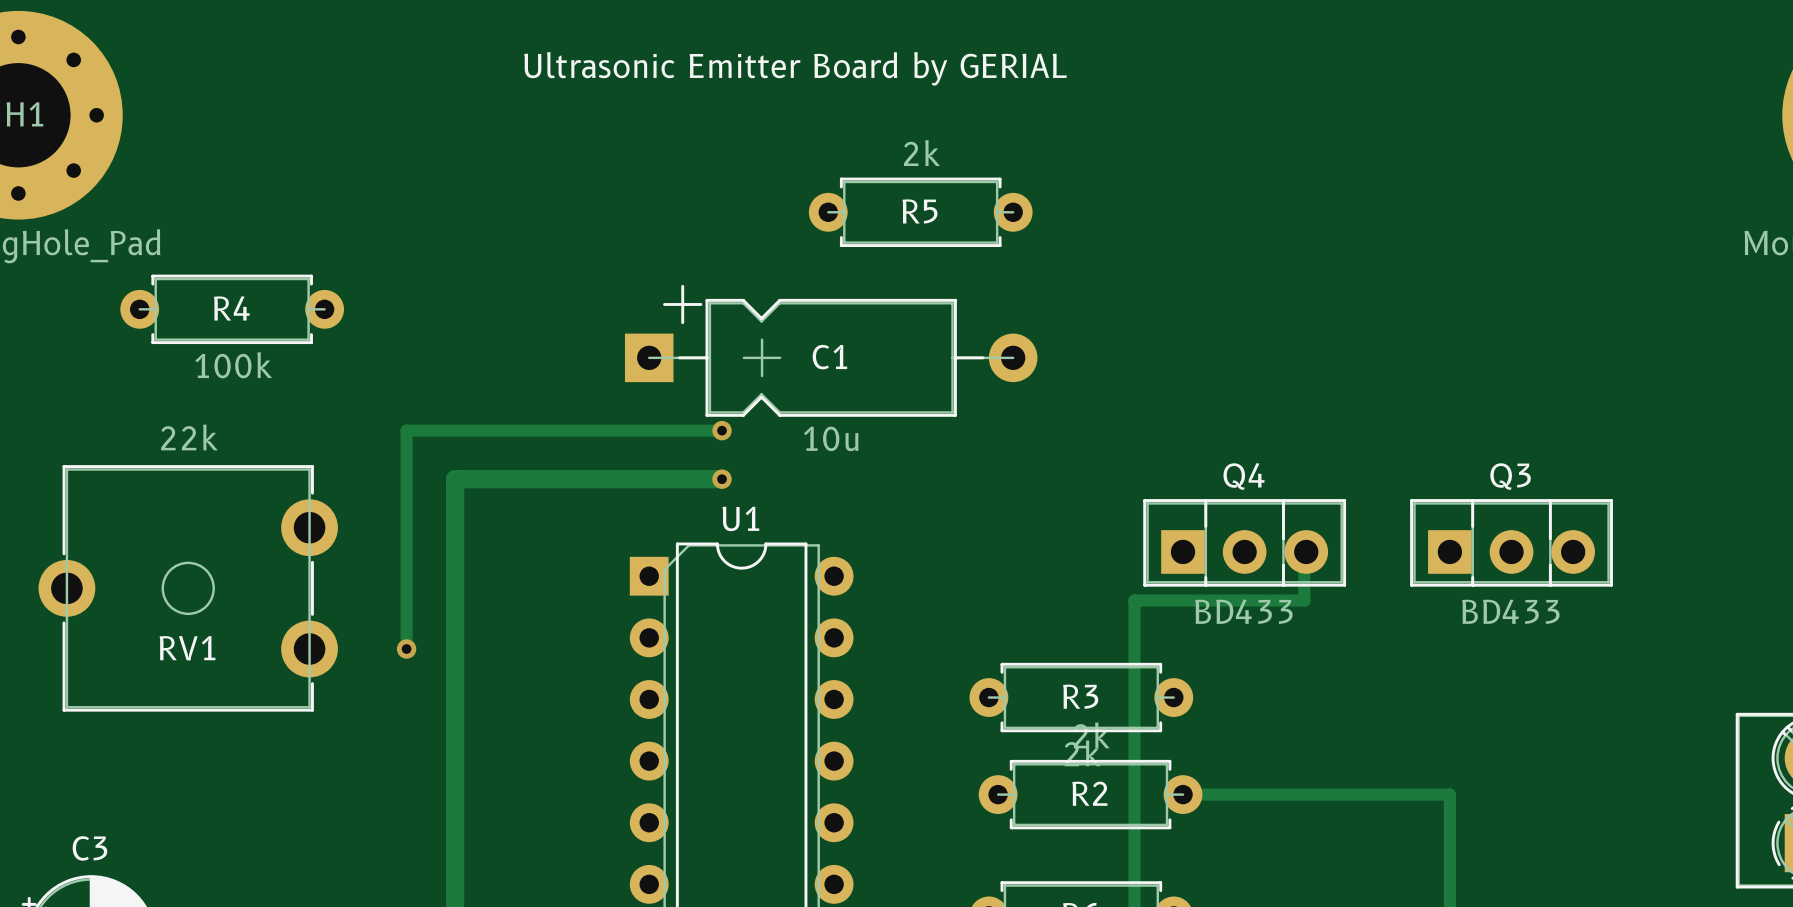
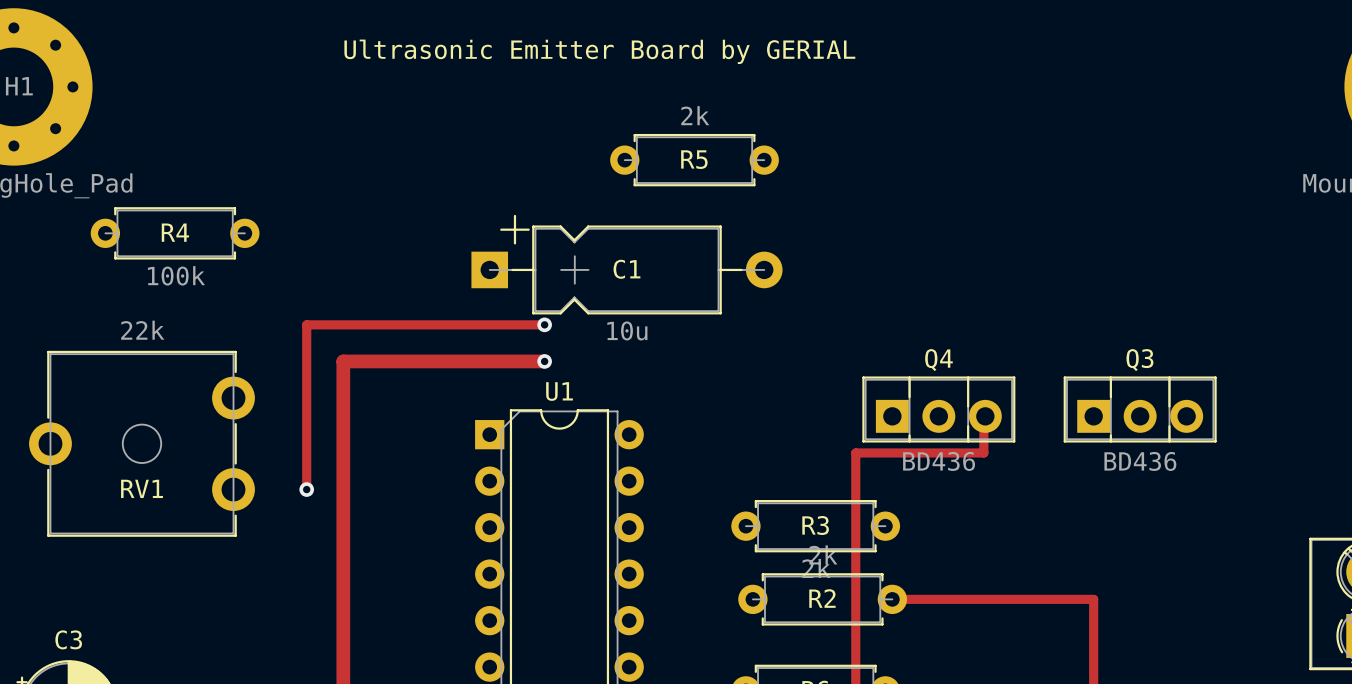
Q4 value: BD433 (1243, 611) -> BD436 (939, 461)
Q3 value: BD433 (1510, 611) -> BD436 (1140, 461)

